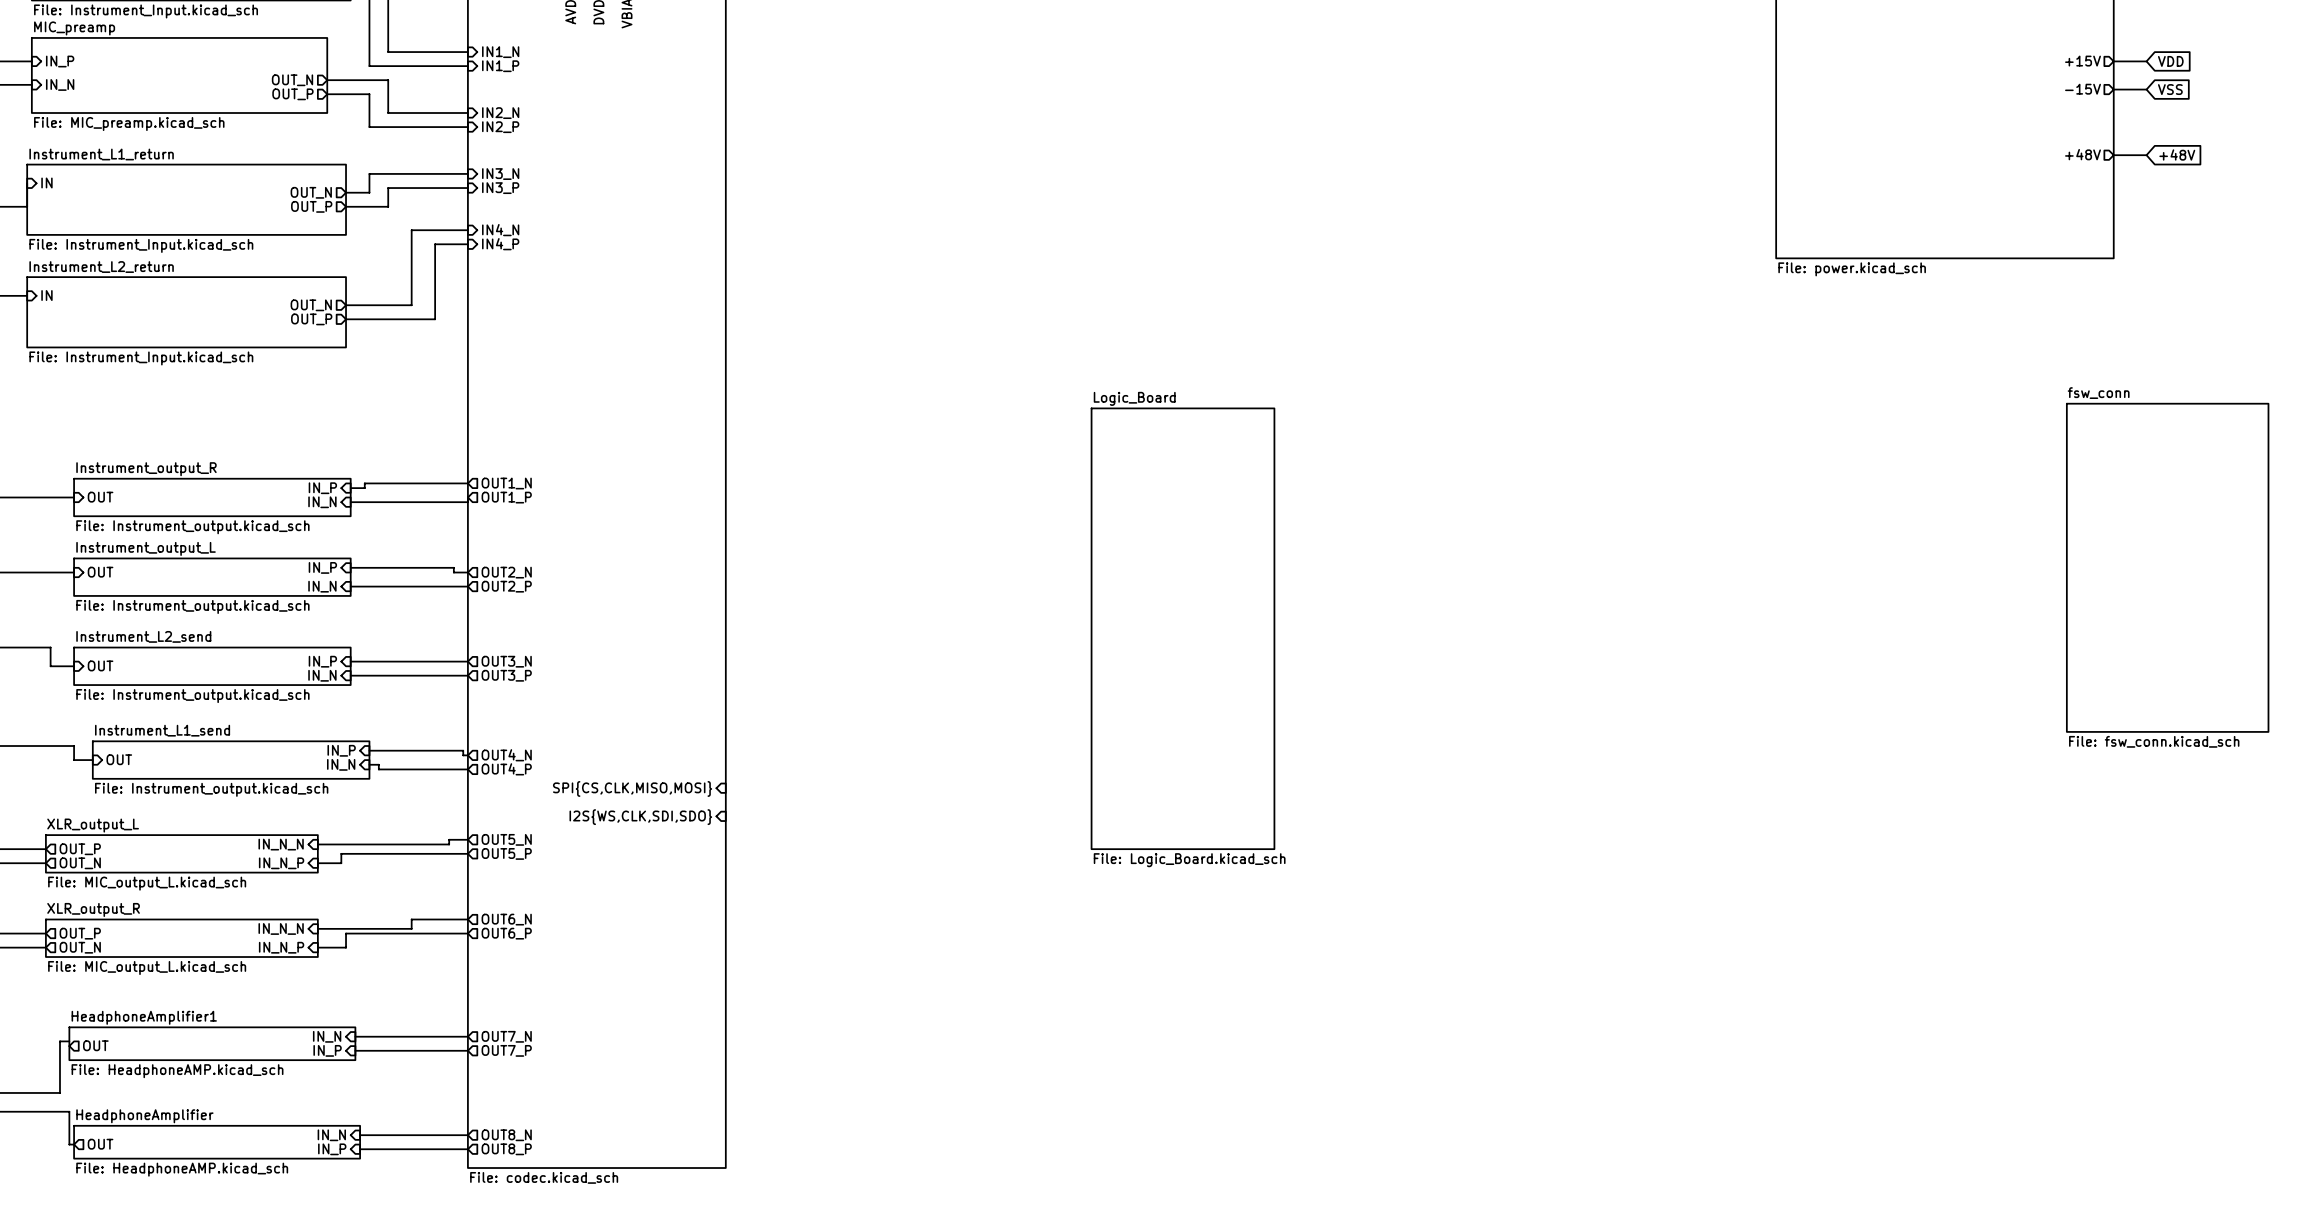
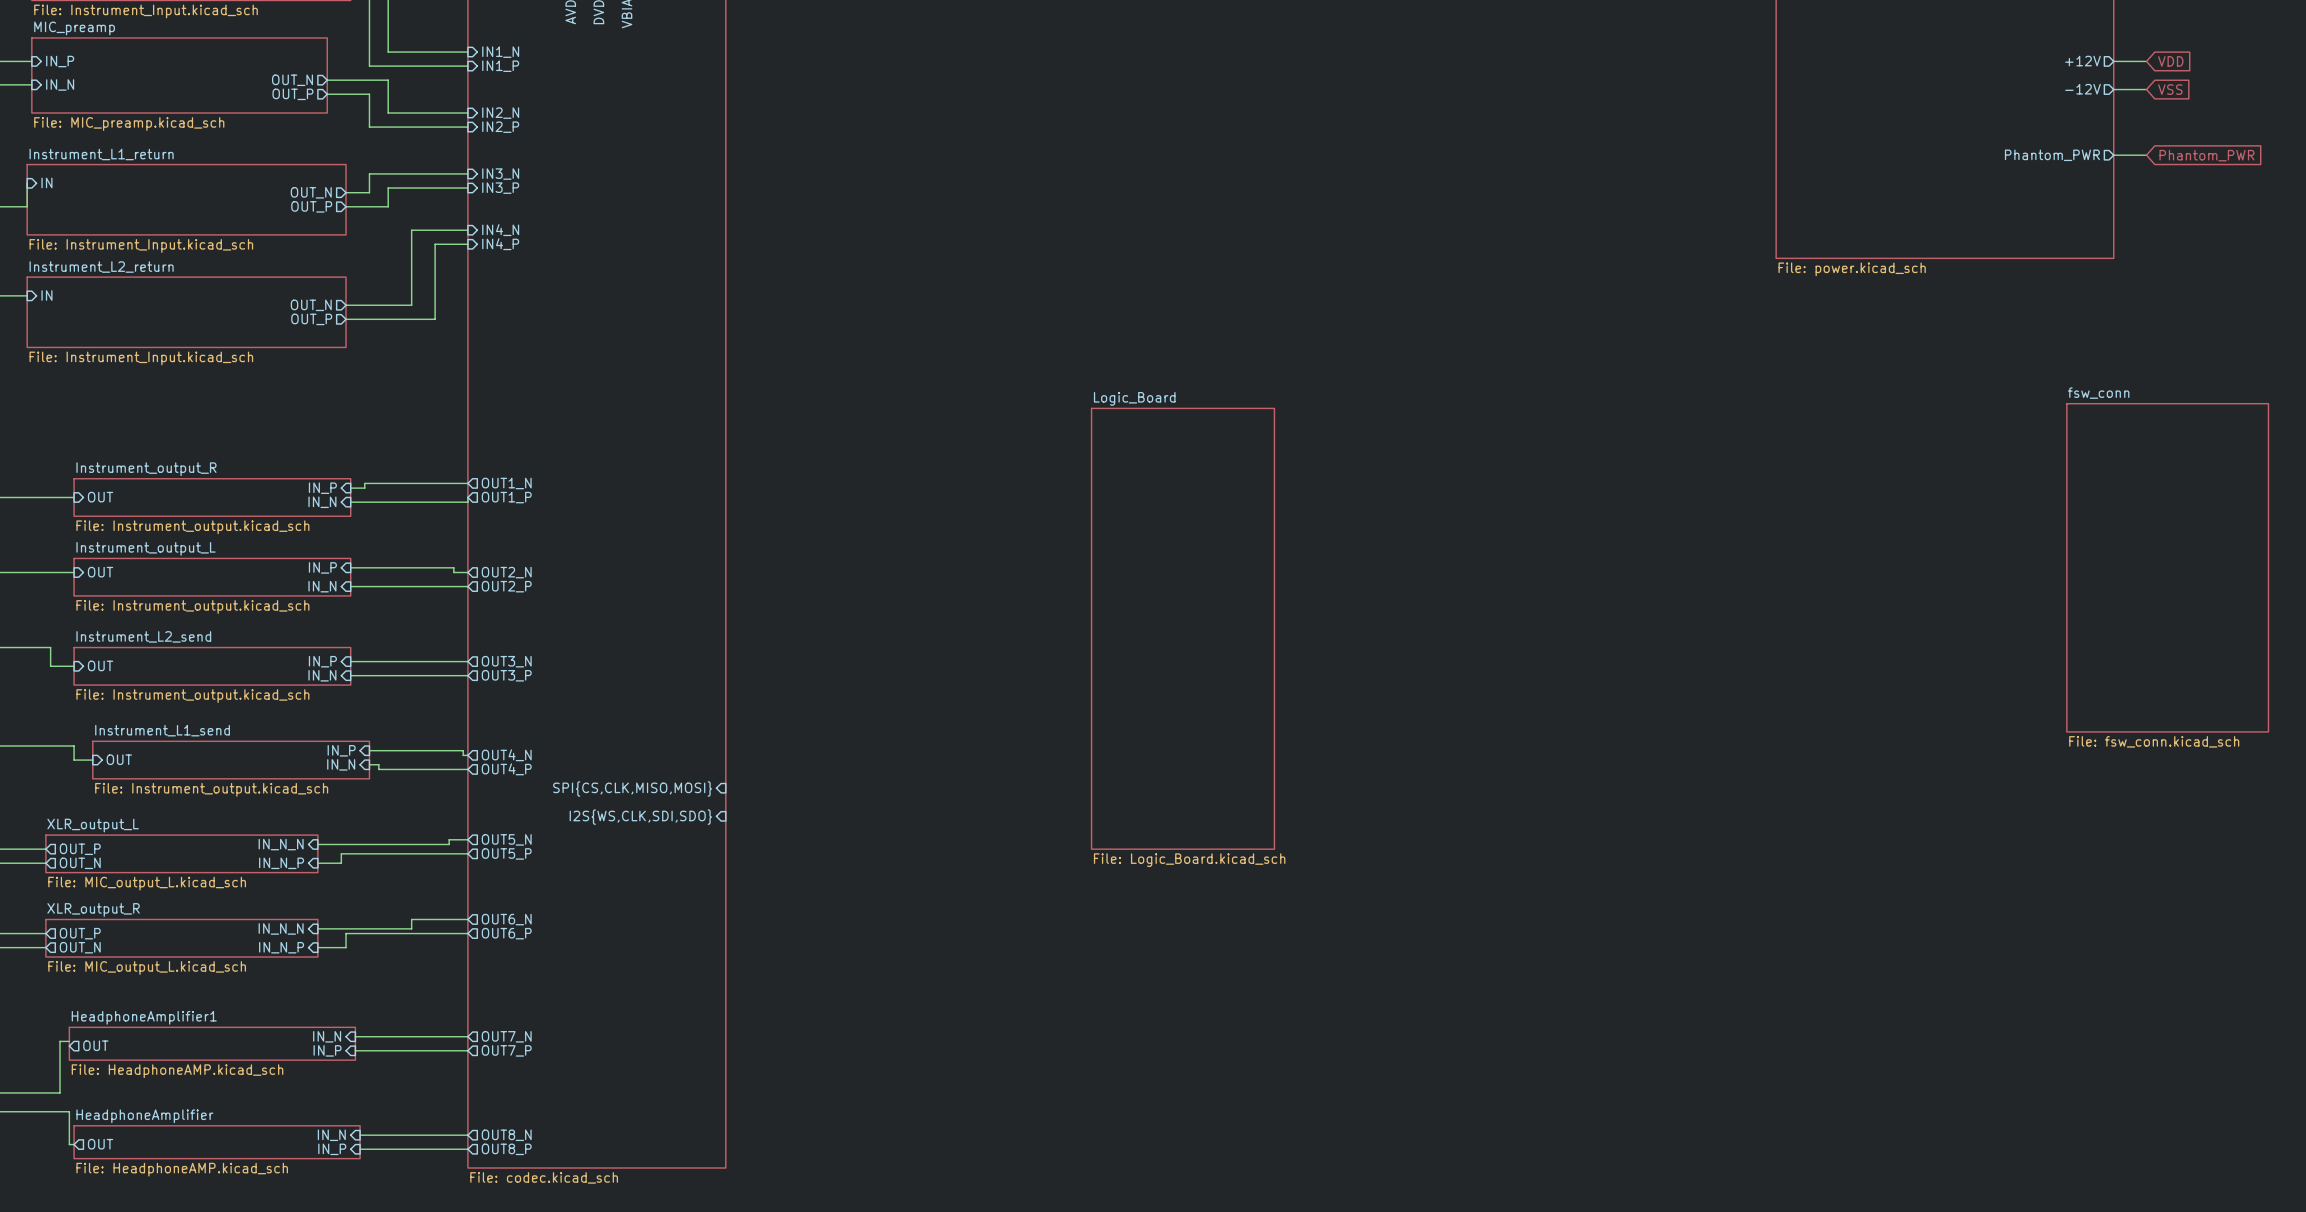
sheet pin: +15V (2083, 61) -> +12V (2083, 61)
sheet pin: -15V (2083, 89) -> -12V (2083, 89)
sheet pin: +48V (2083, 154) -> Phantom_PWR (2052, 155)
global label: +48V (2177, 154) -> Phantom_PWR (2206, 155)

